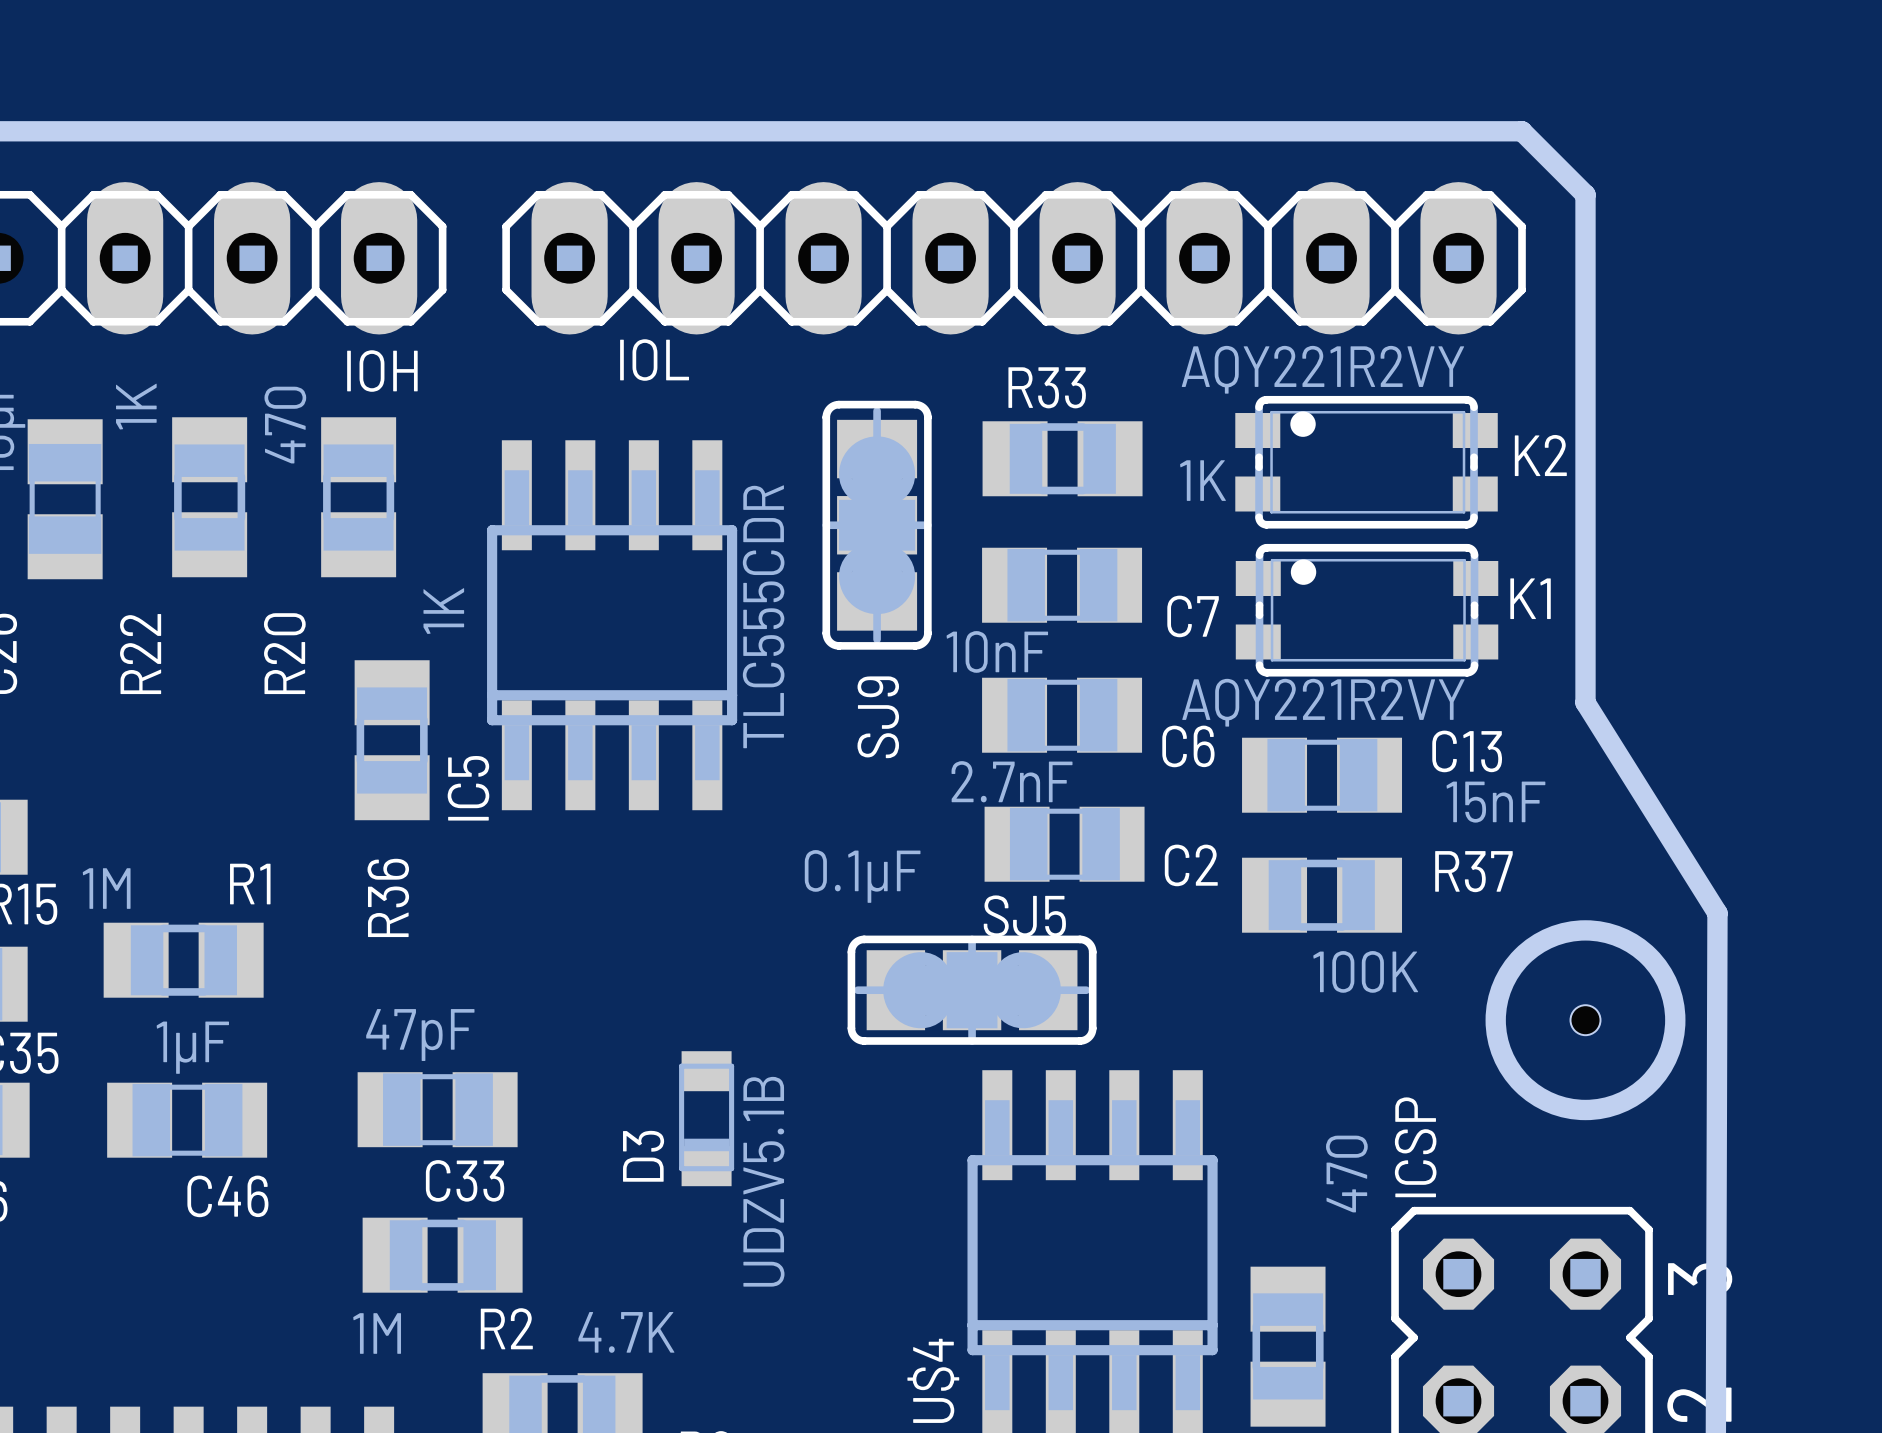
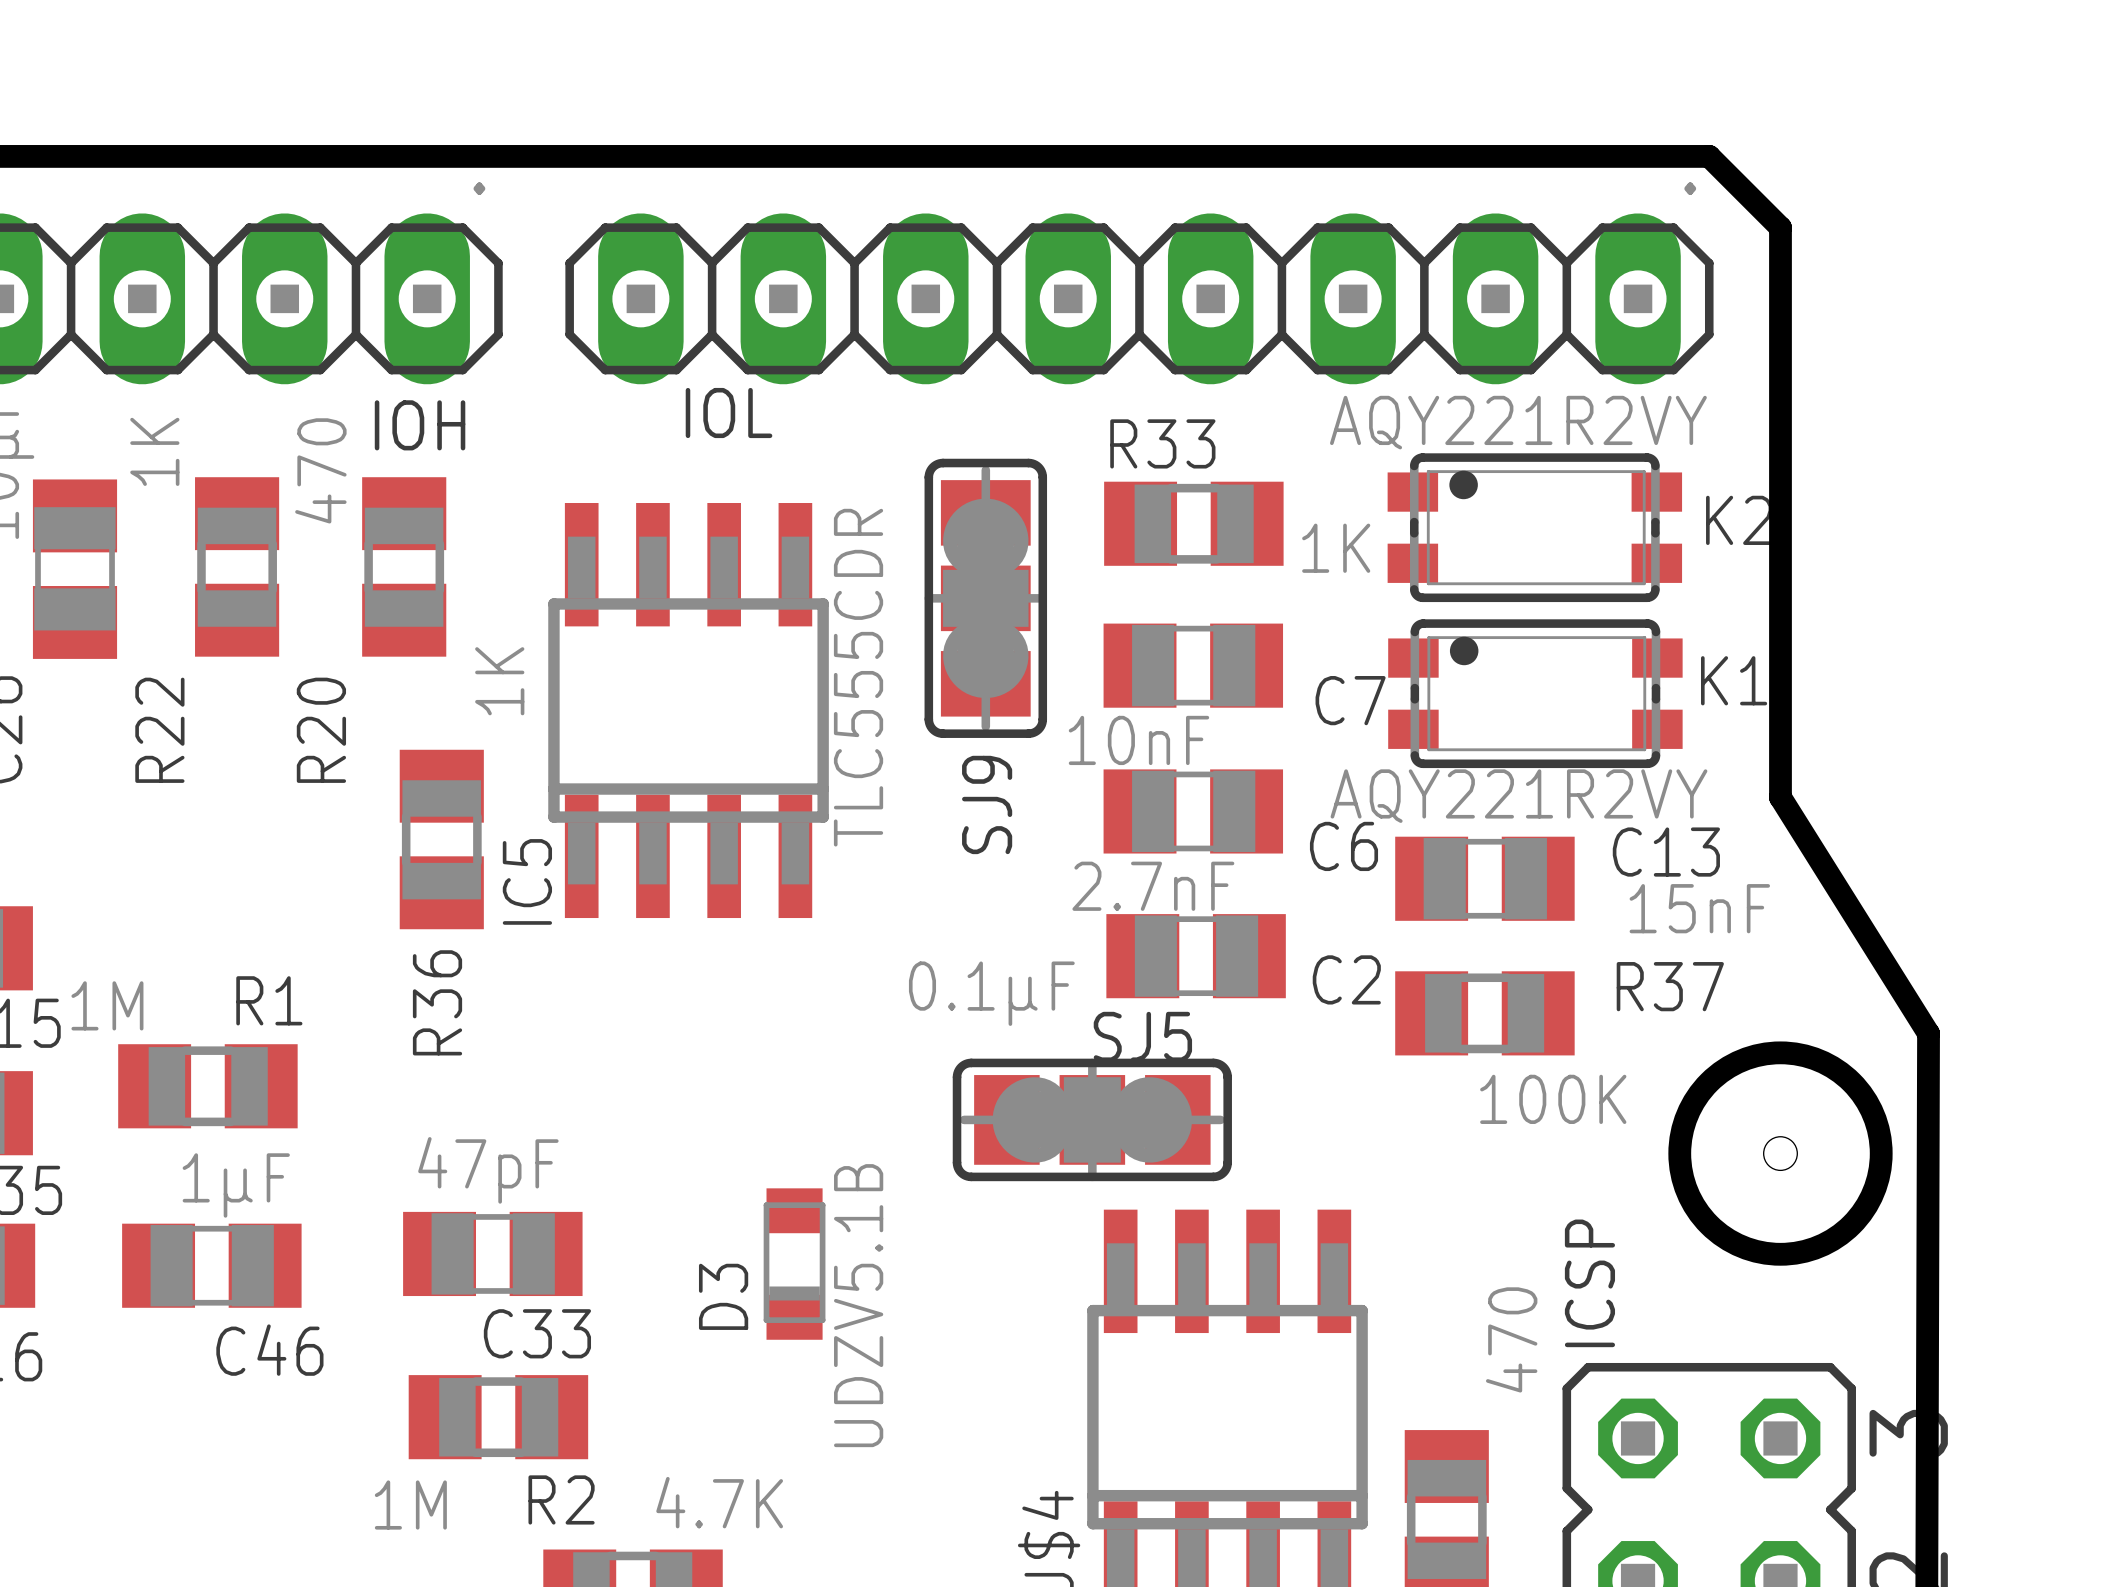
IOH value: none -> . (479, 188)
IOL value: none -> . (1690, 188)

